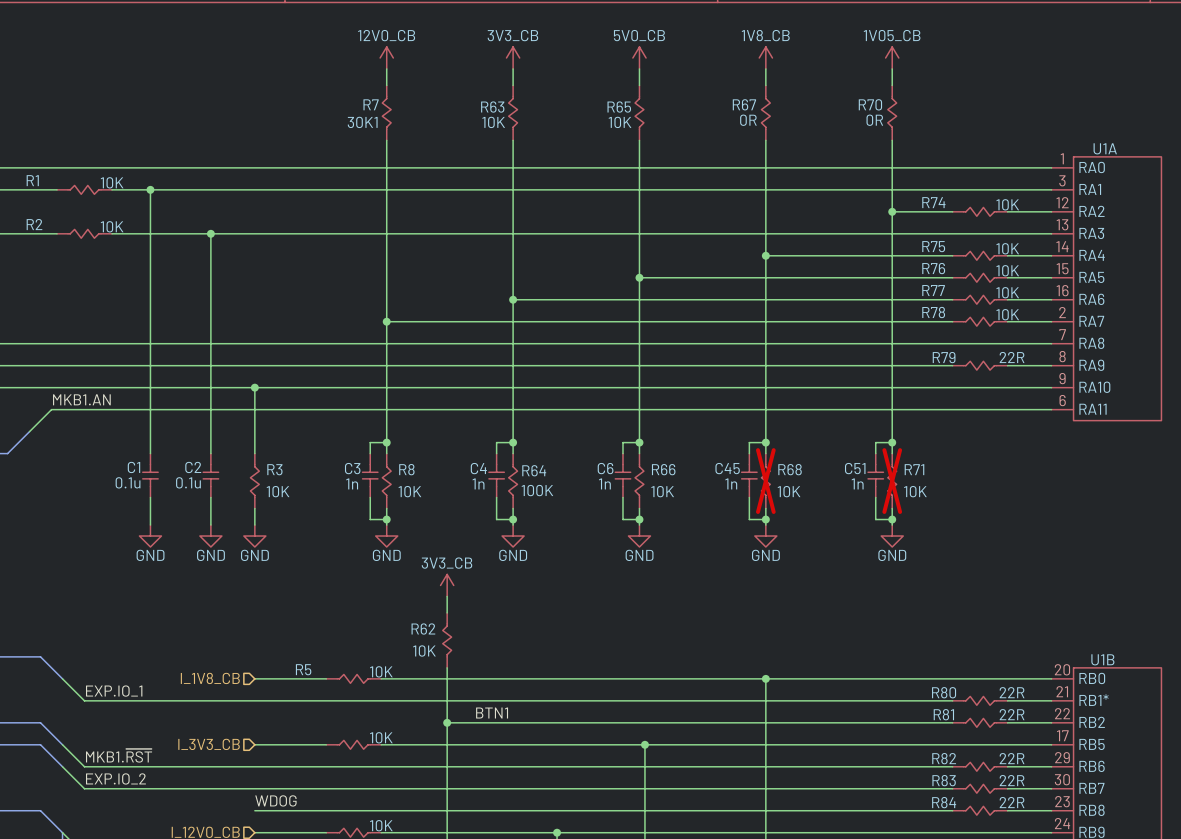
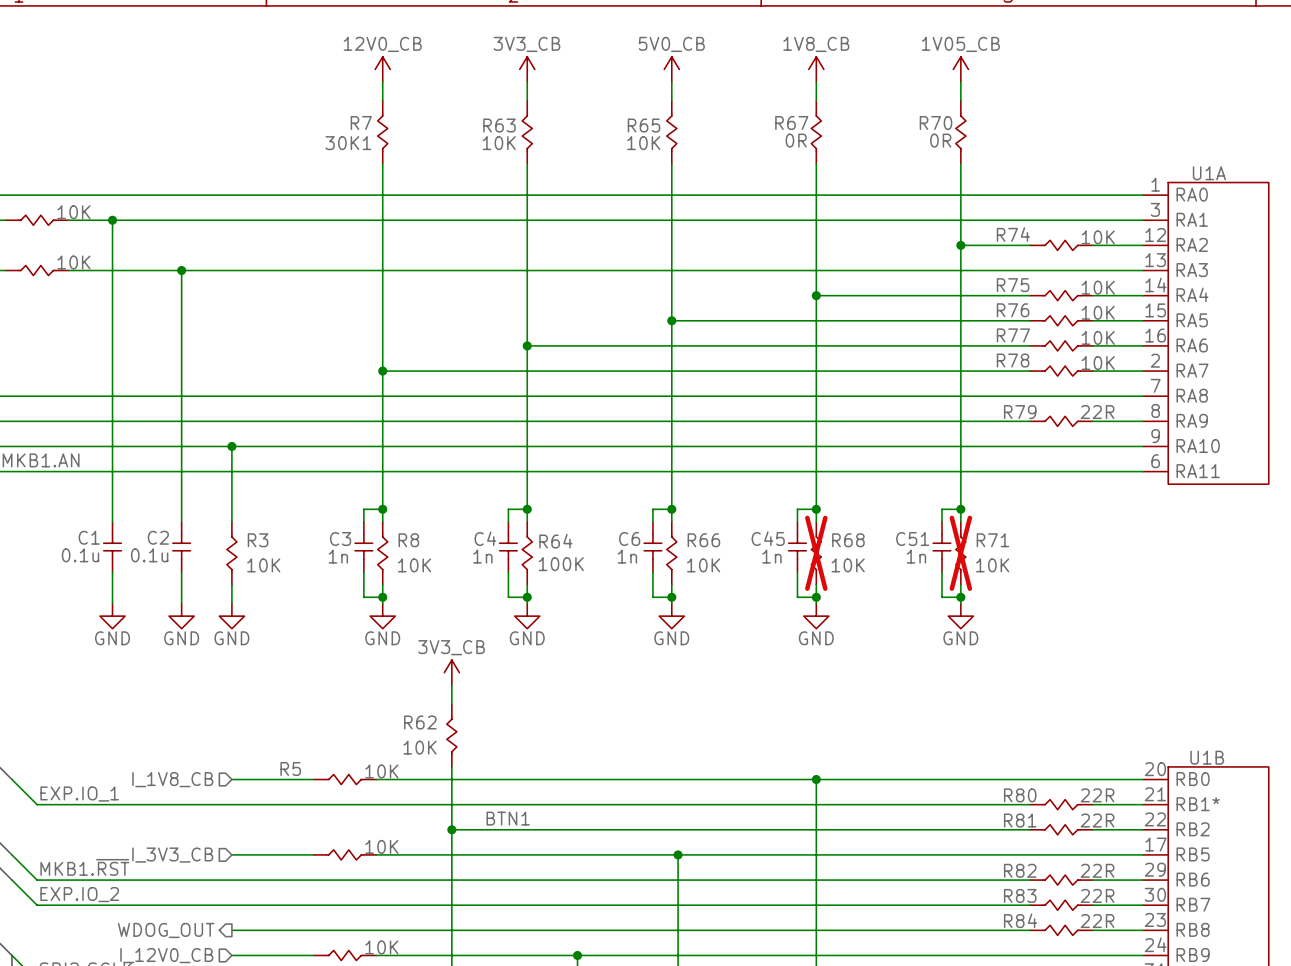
label: WDOG (275, 800) -> none
hierarchical label: none -> WDOG_OUT (166, 930)

